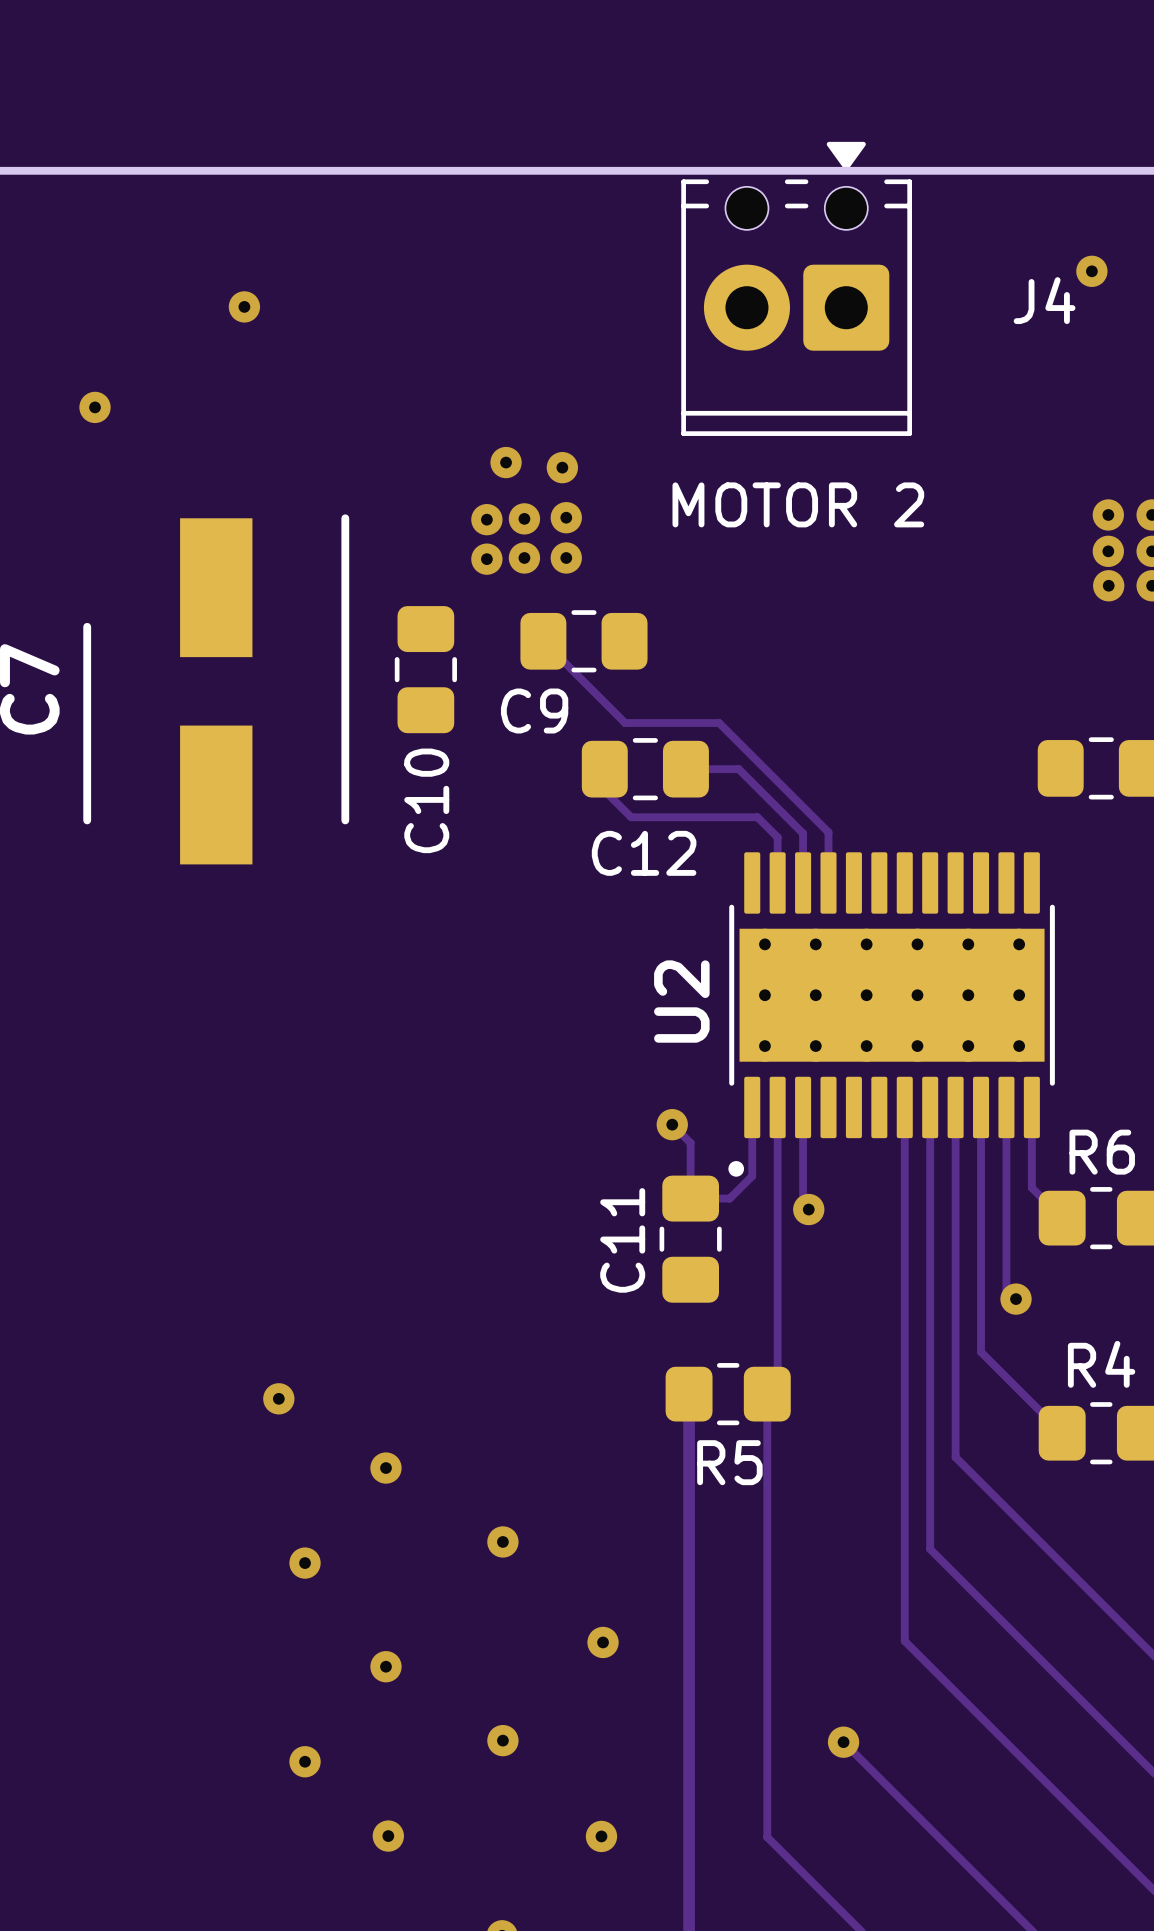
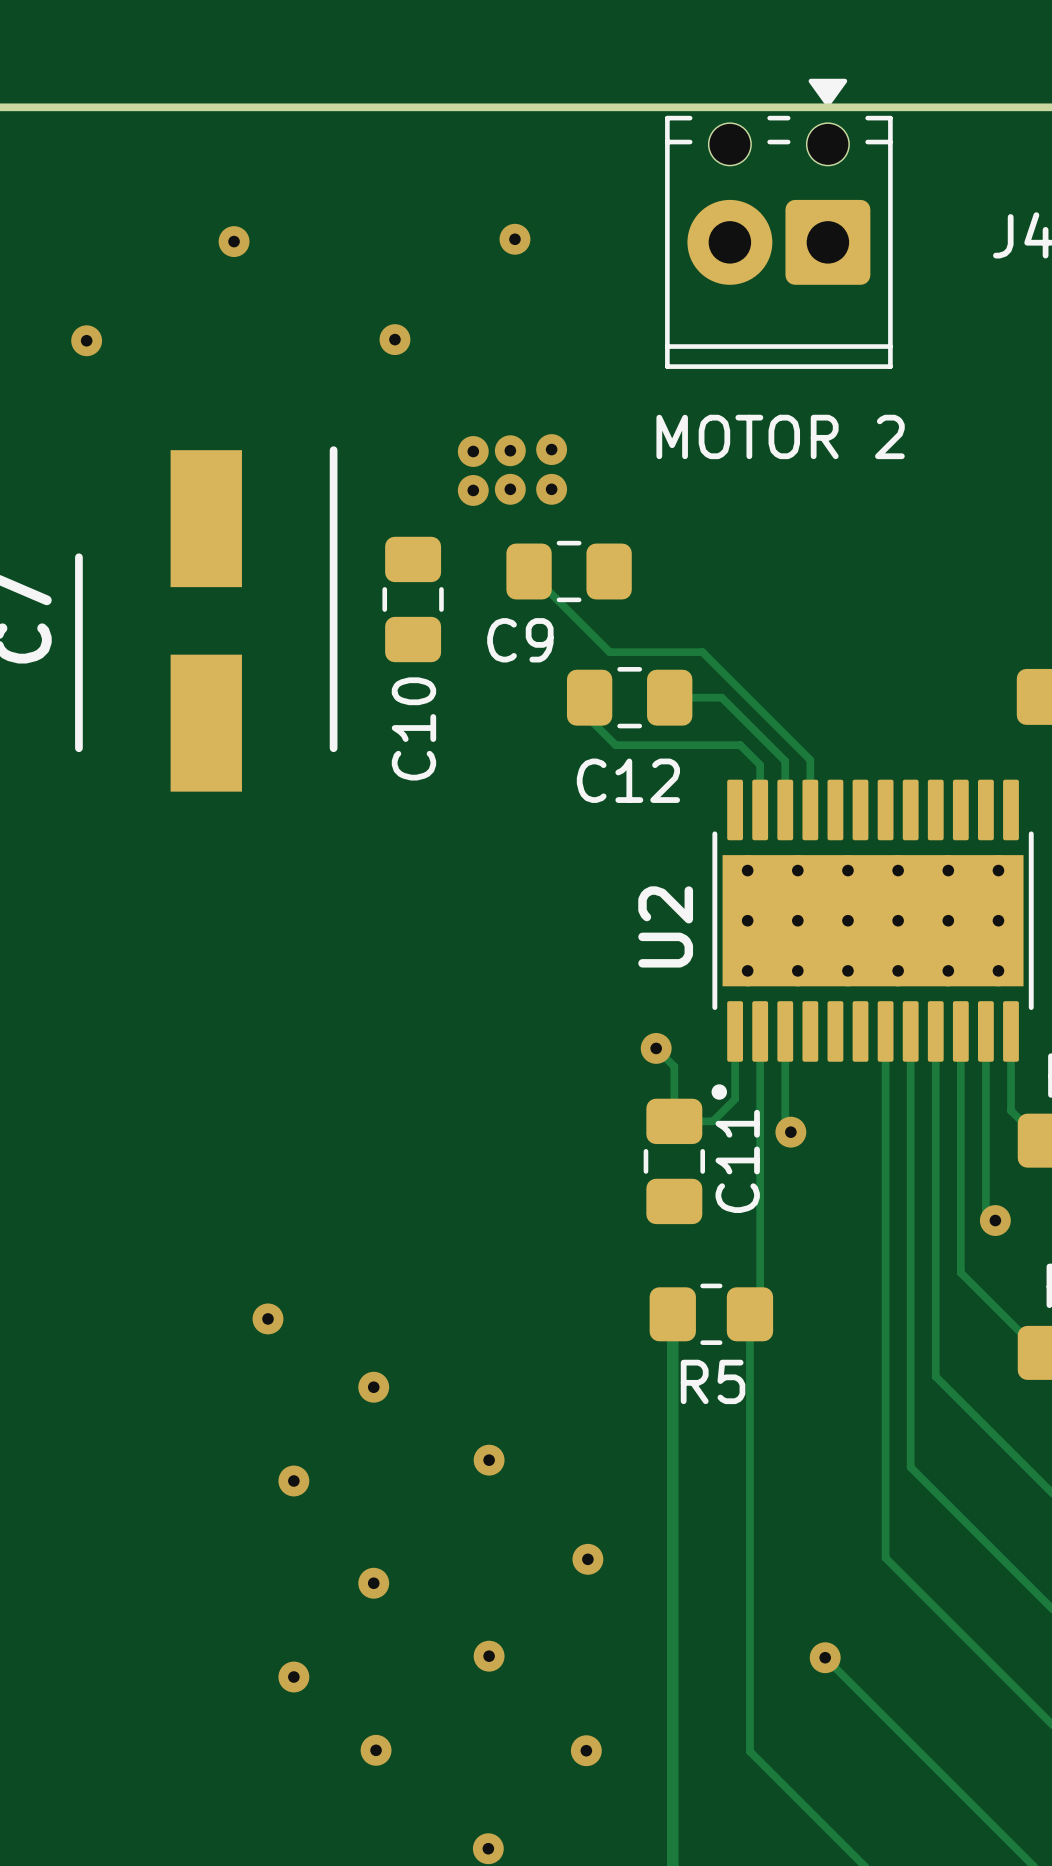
via: none -> (514, 239)
via: none -> (394, 339)
via: (506, 462) -> none
via: (562, 467) -> none
C11 name position: C11 (622, 1240) -> C11 (737, 1161)

